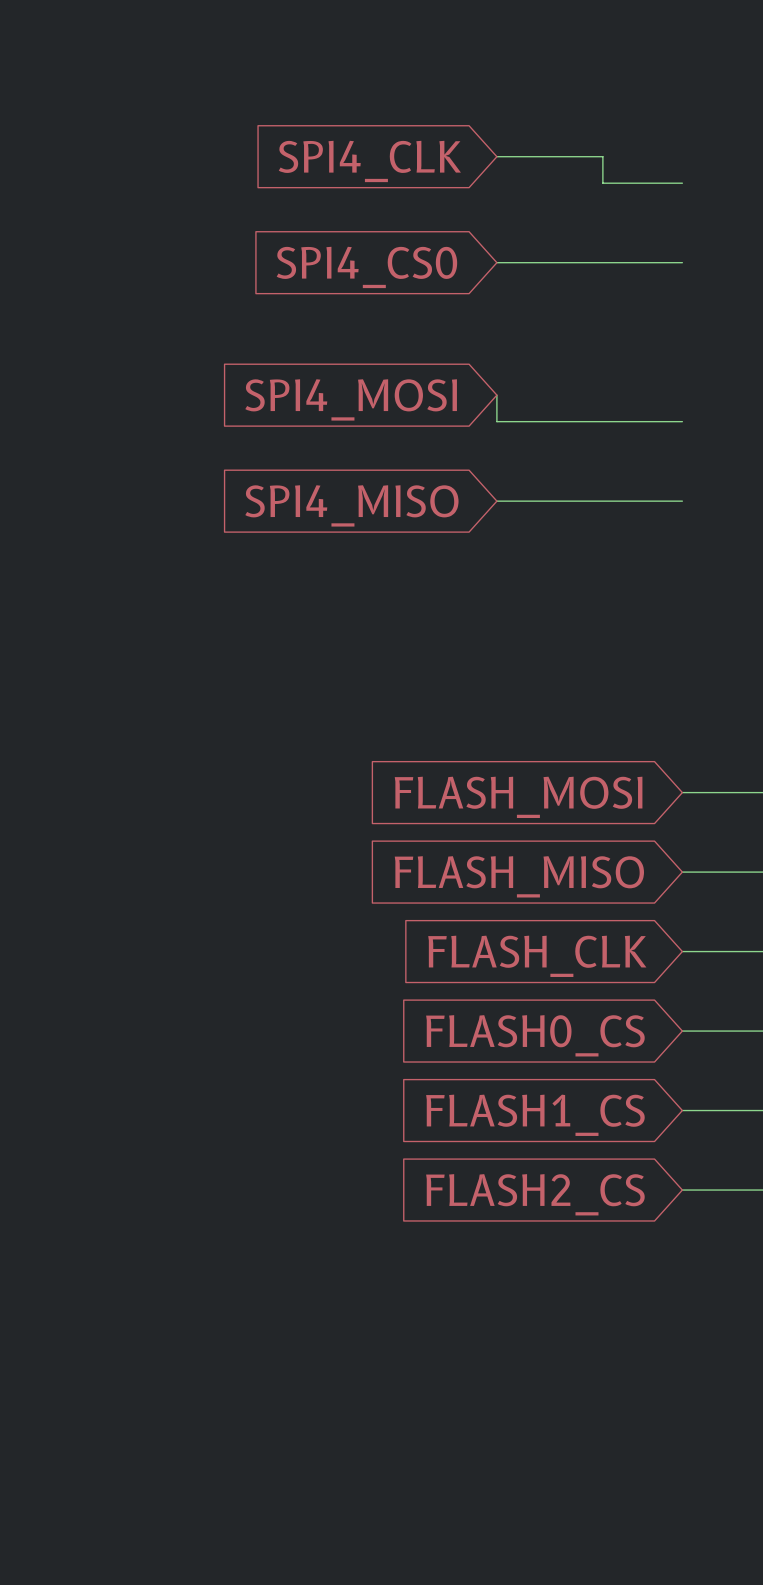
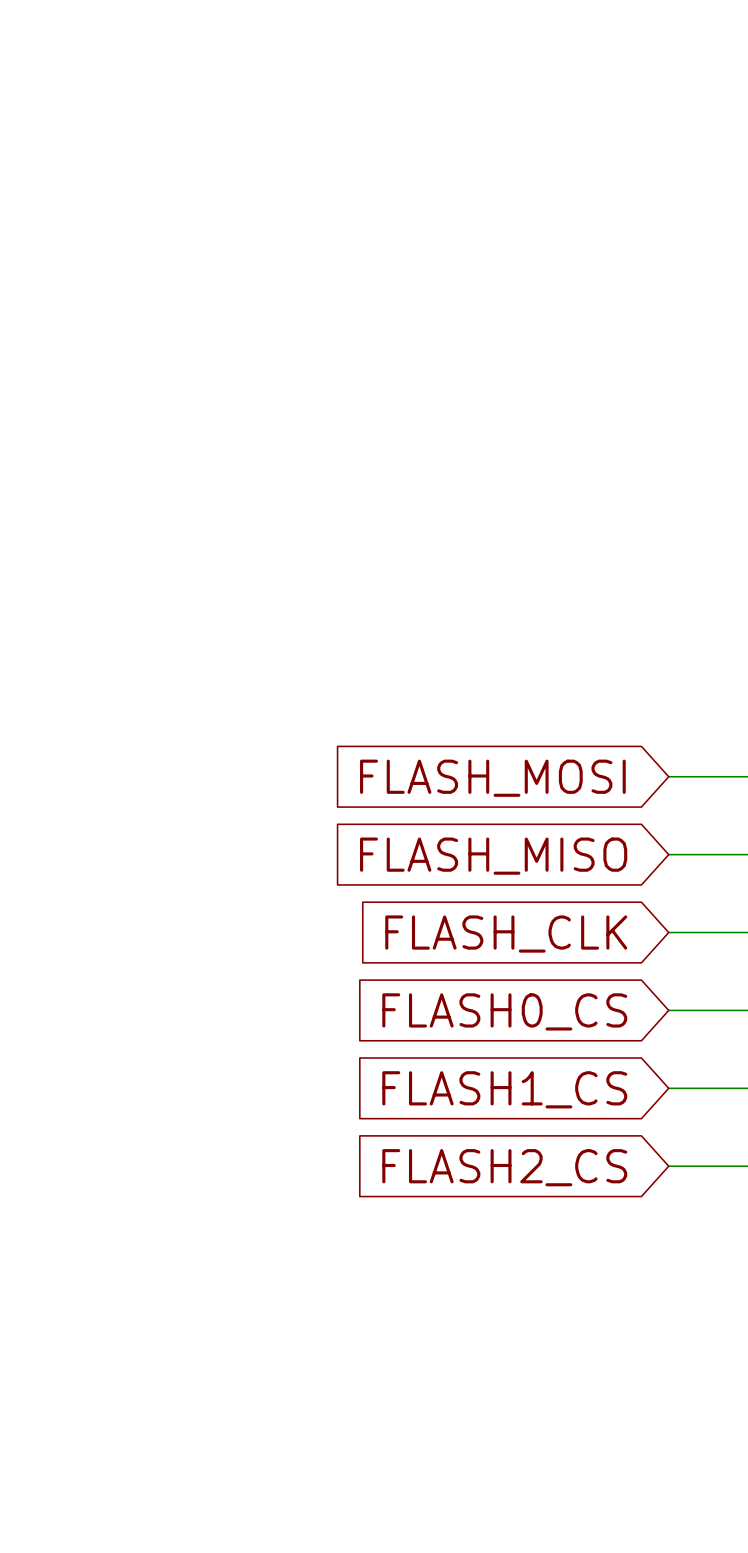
wire: (496, 156) (602, 156) (602, 183) (682, 183) -> none
global label: SPI4_CLK (369, 161) -> none
wire: (496, 262) (682, 262) -> none
global label: SPI4_CS0 (366, 267) -> none
wire: (496, 395) (496, 421) (682, 421) -> none
global label: SPI4_MOSI (351, 399) -> none
wire: (496, 501) (682, 501) -> none
global label: SPI4_MISO (351, 505) -> none

